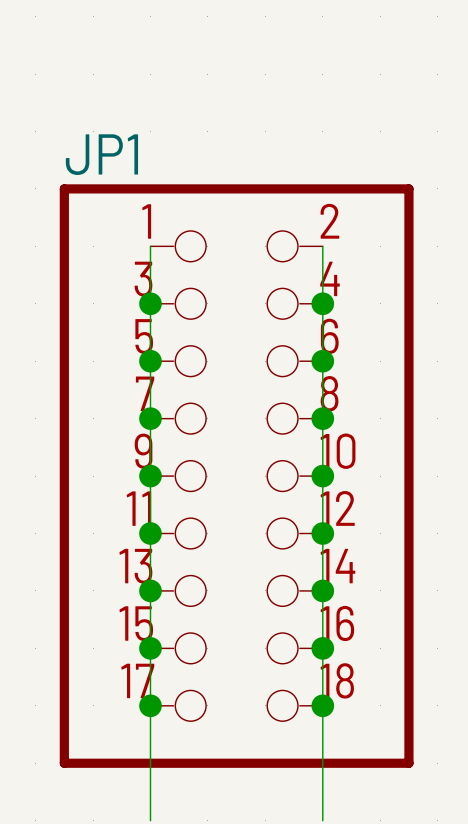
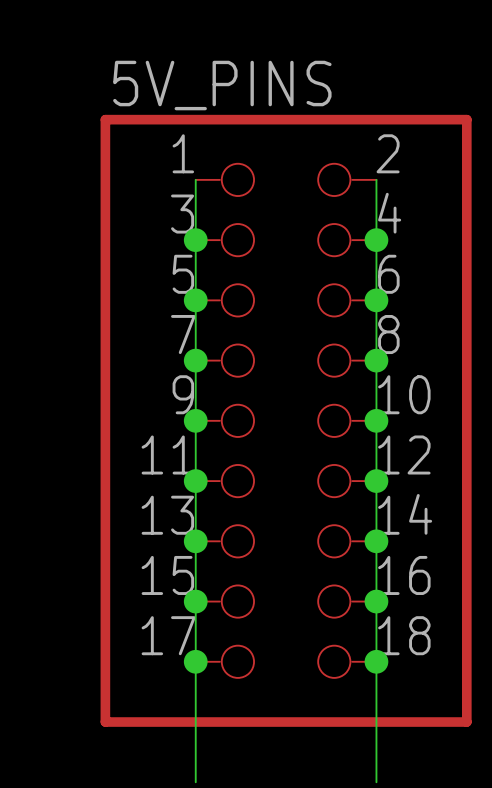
JP1 name: JP1 (101, 154) -> 5V_PINS (222, 85)

